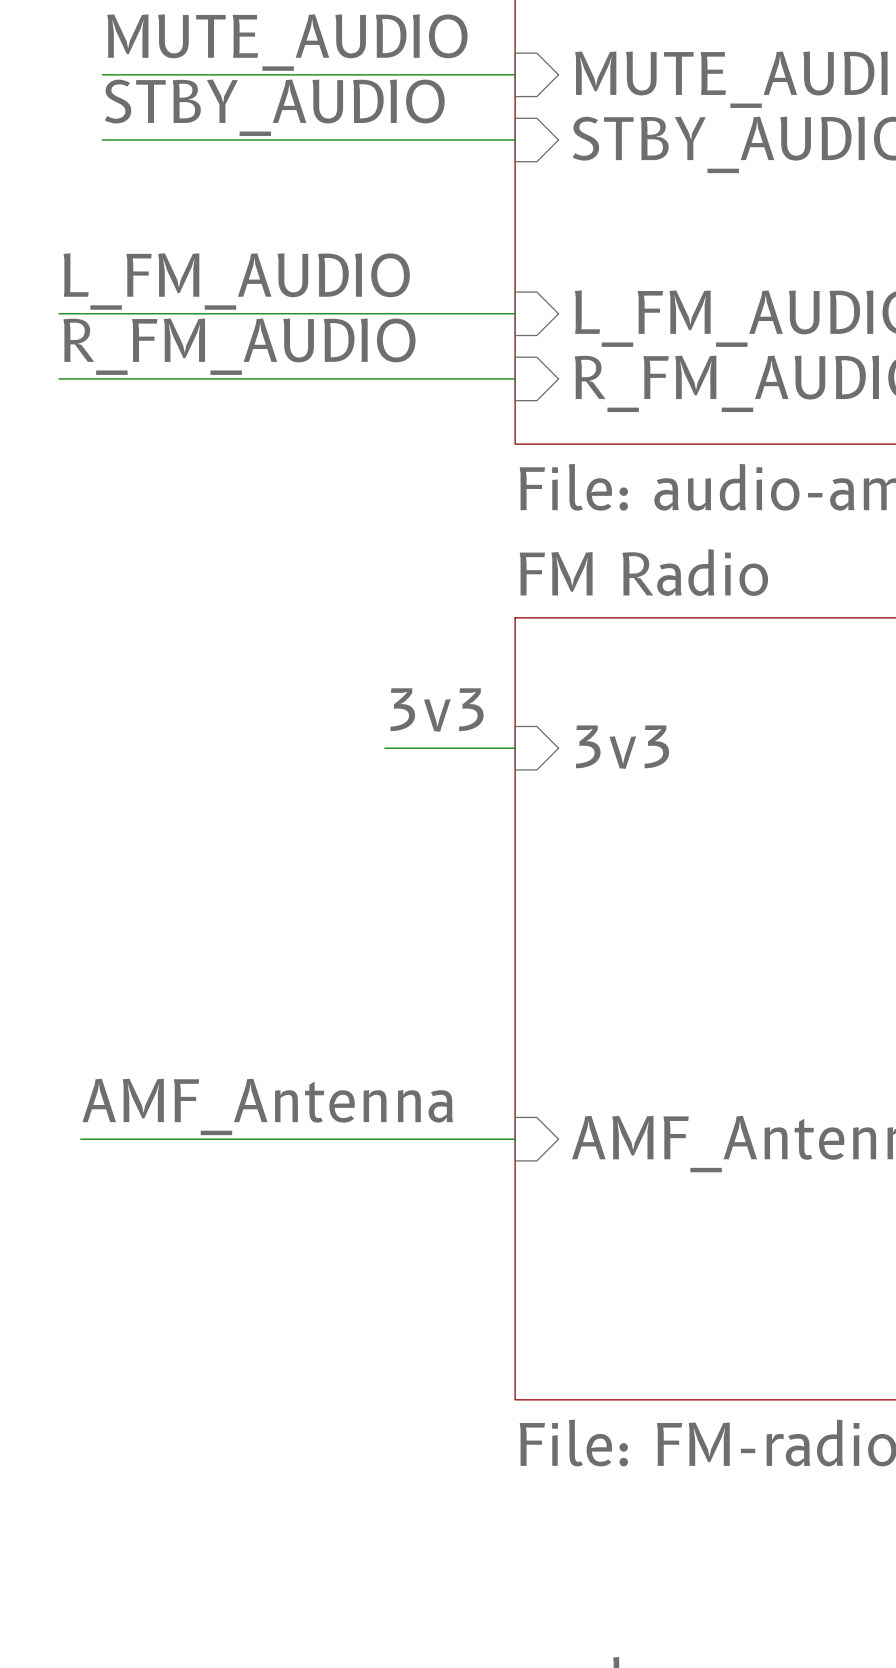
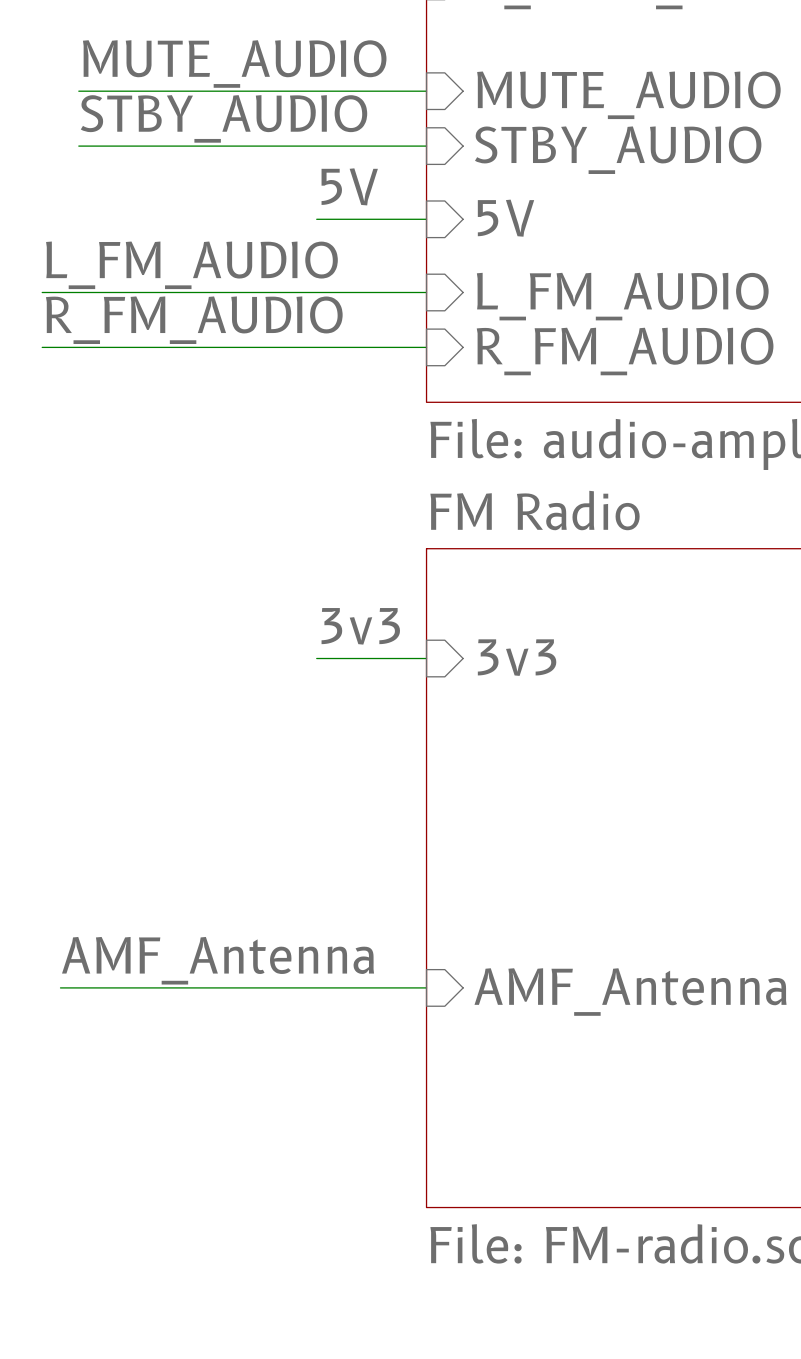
label: none -> 5V (349, 186)
sheet pin: none -> 5V (506, 218)
wire: none -> (316, 219) (426, 219)

